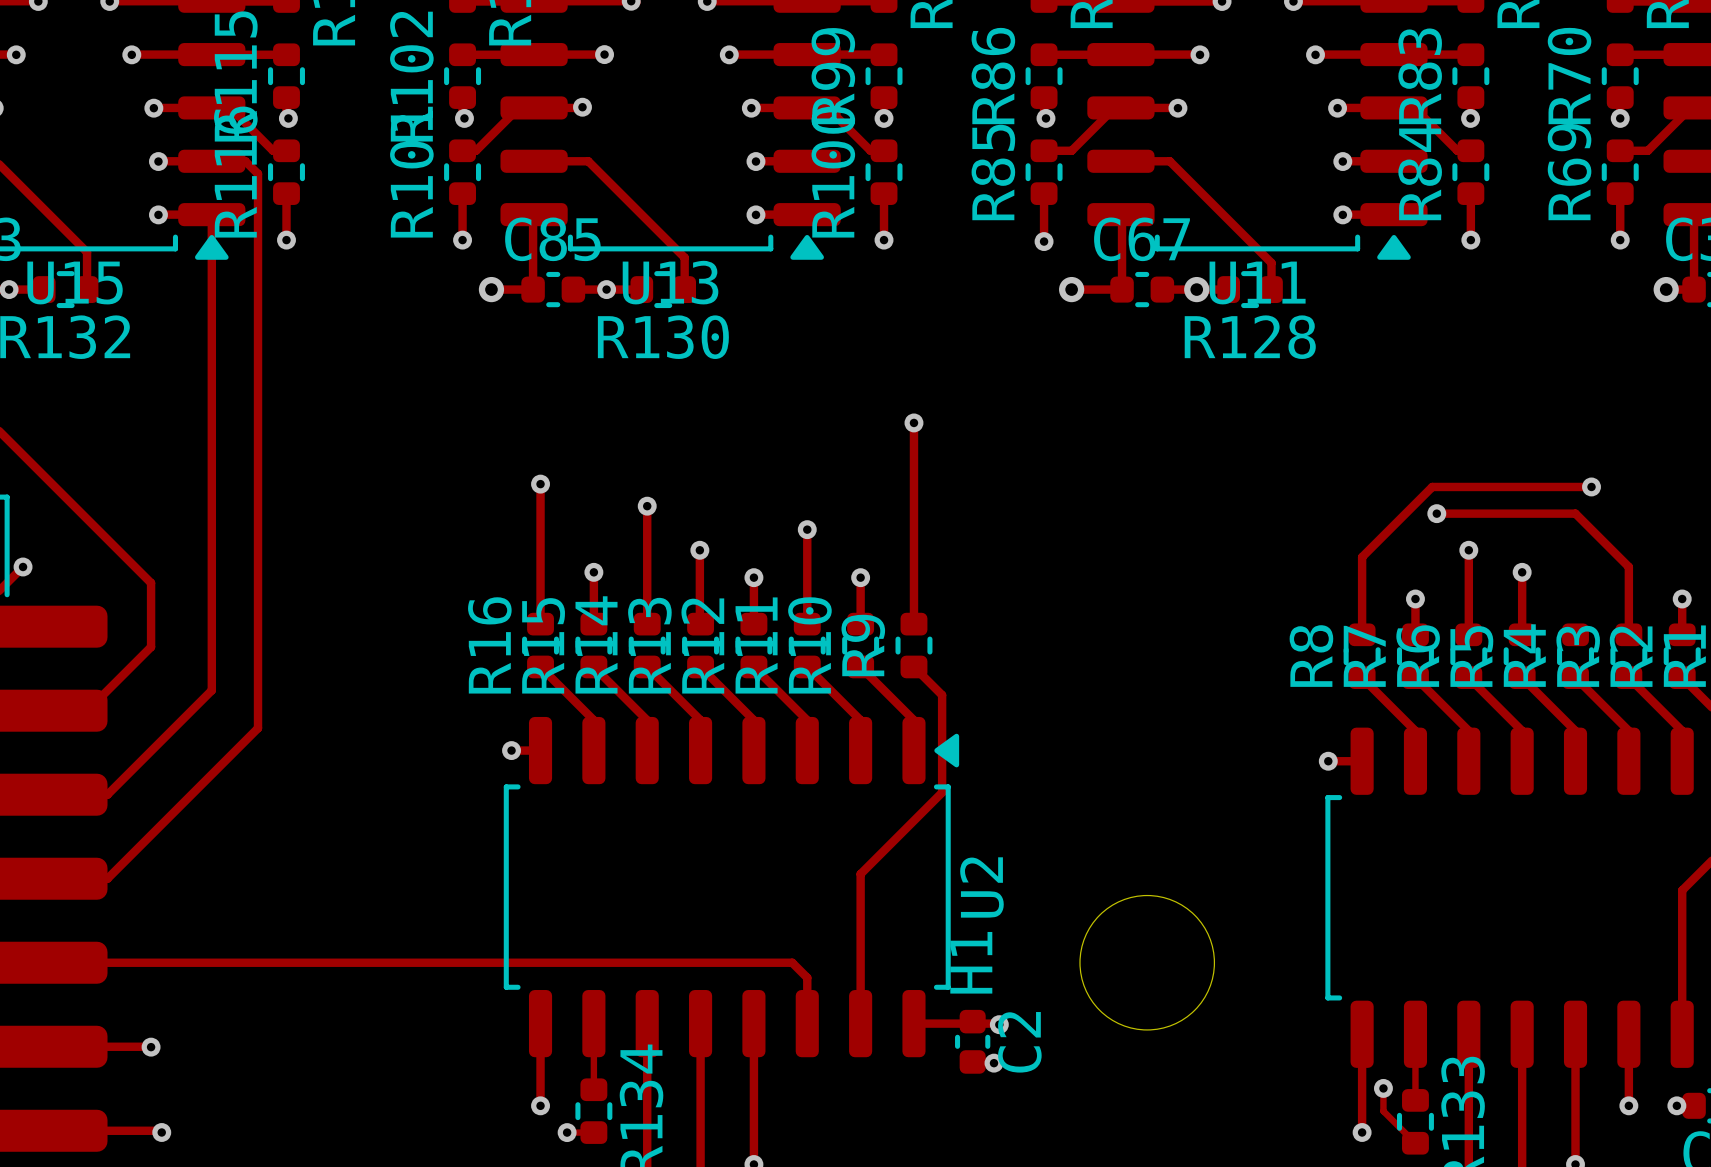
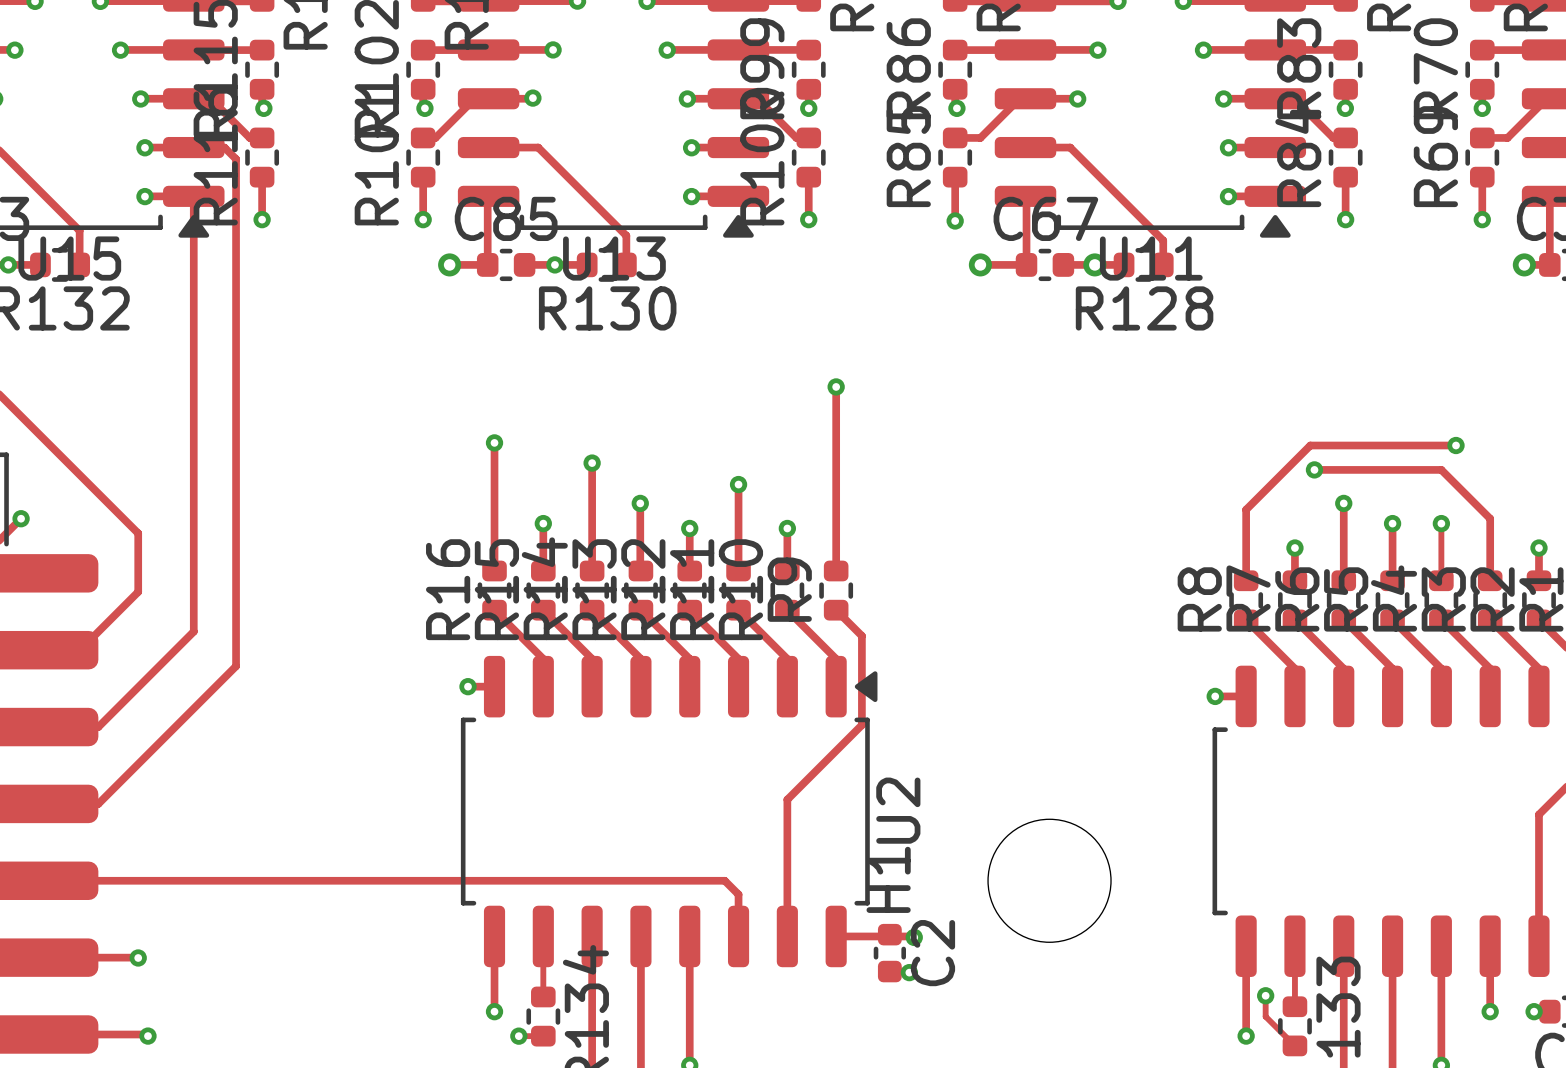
track: none -> (1441, 523) (1441, 580)
via: none -> (1441, 523)

